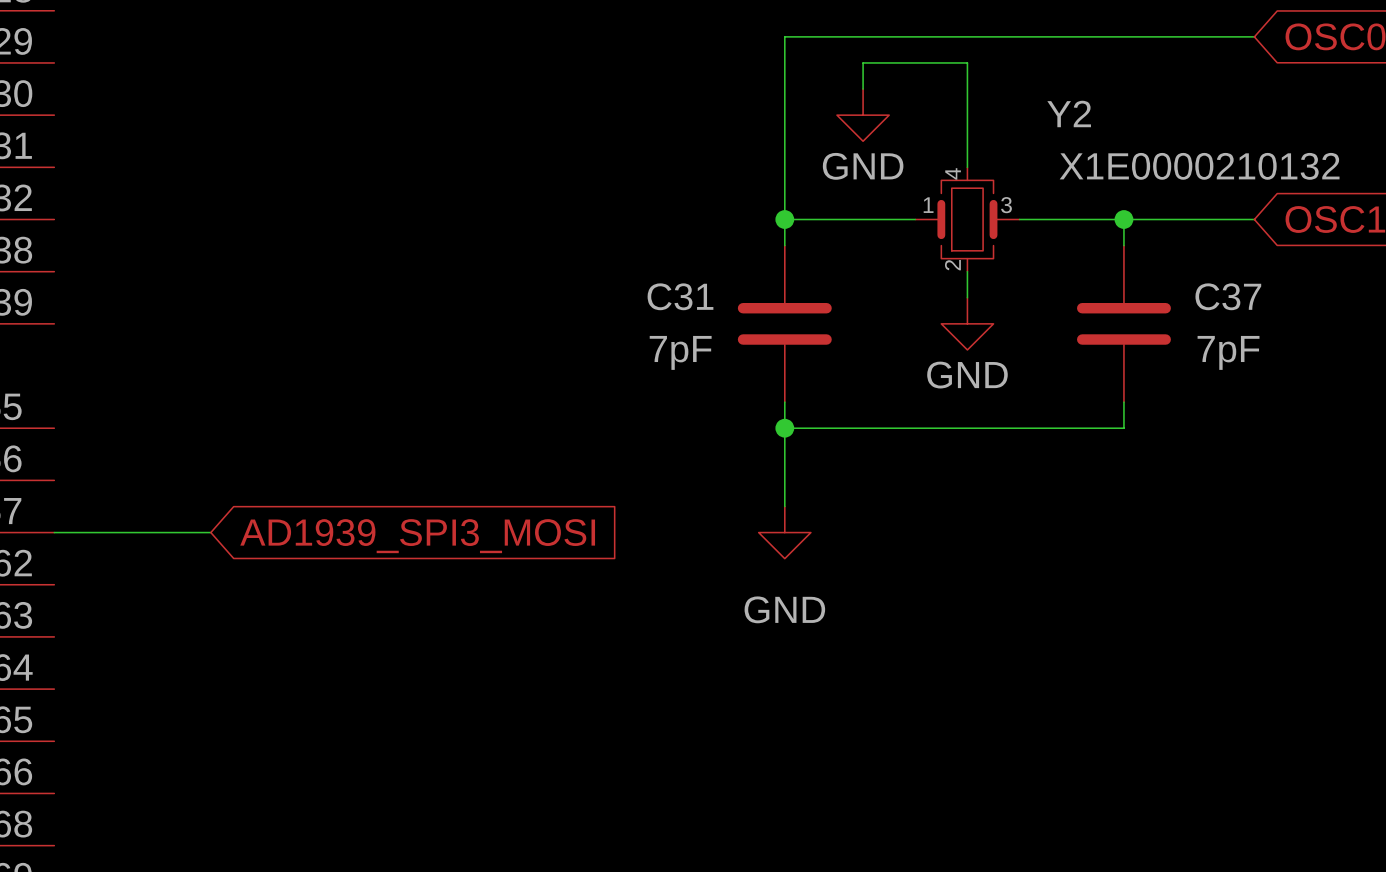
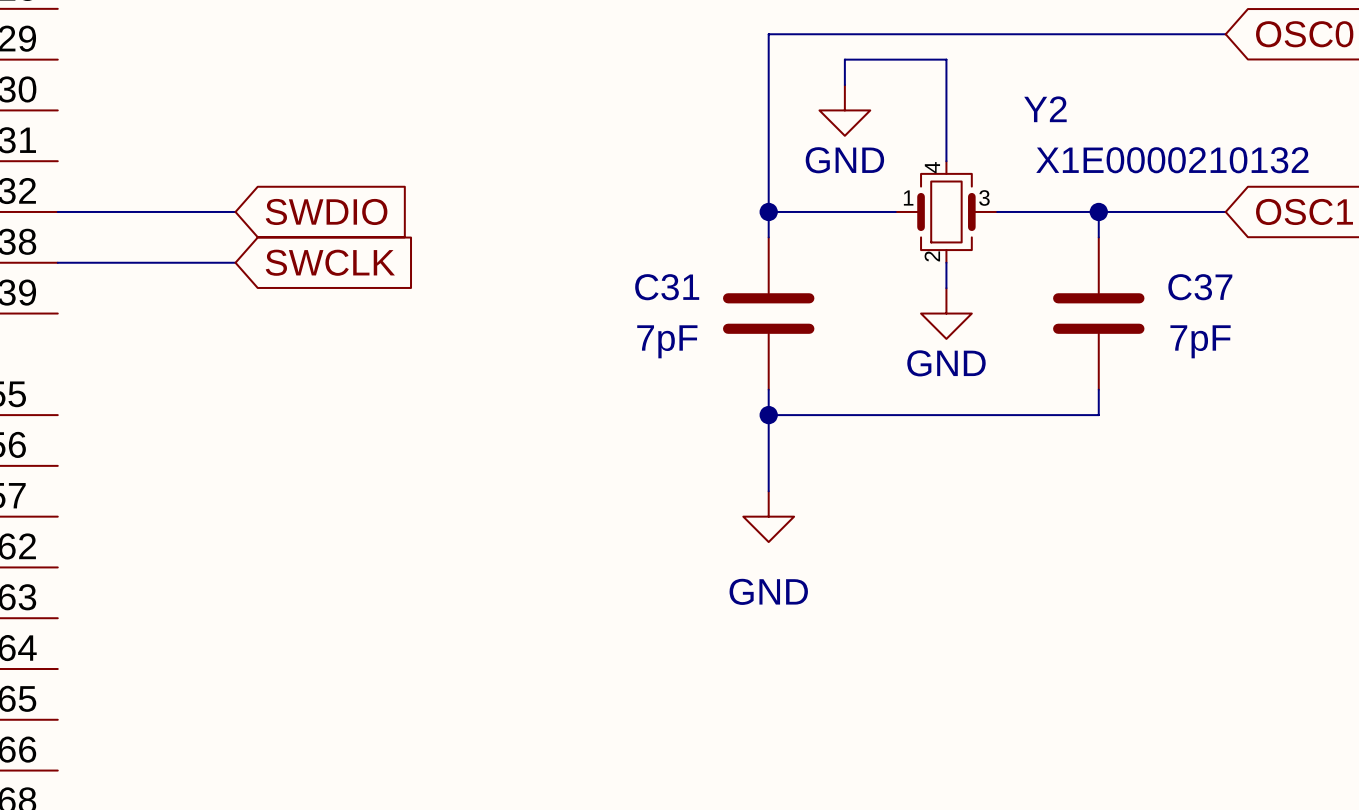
wire: none -> (57, 211) (235, 211)
global label: none -> SWDIO (326, 211)
wire: none -> (57, 262) (235, 262)
global label: none -> SWCLK (330, 262)
wire: (54, 532) (210, 532) -> none
global label: AD1939_SPI3_MOSI (417, 536) -> none

